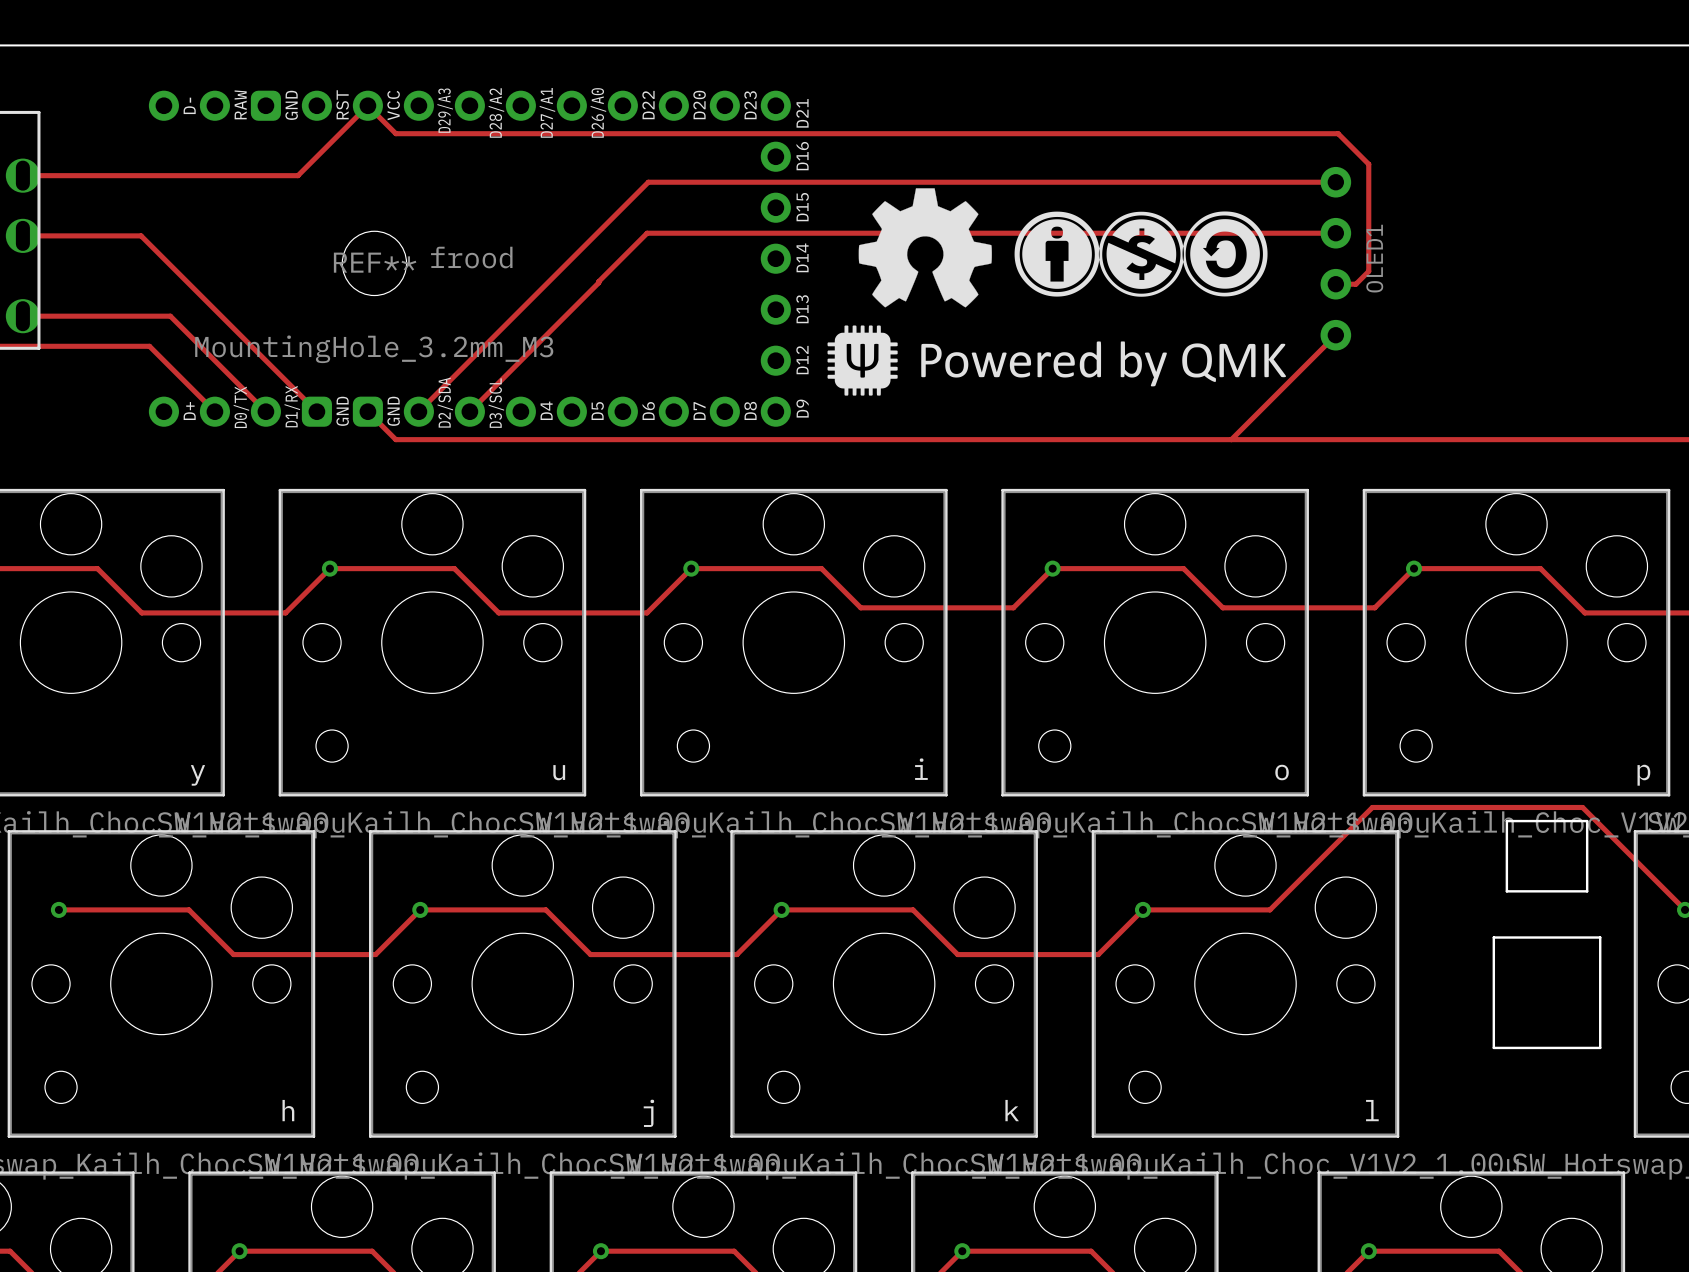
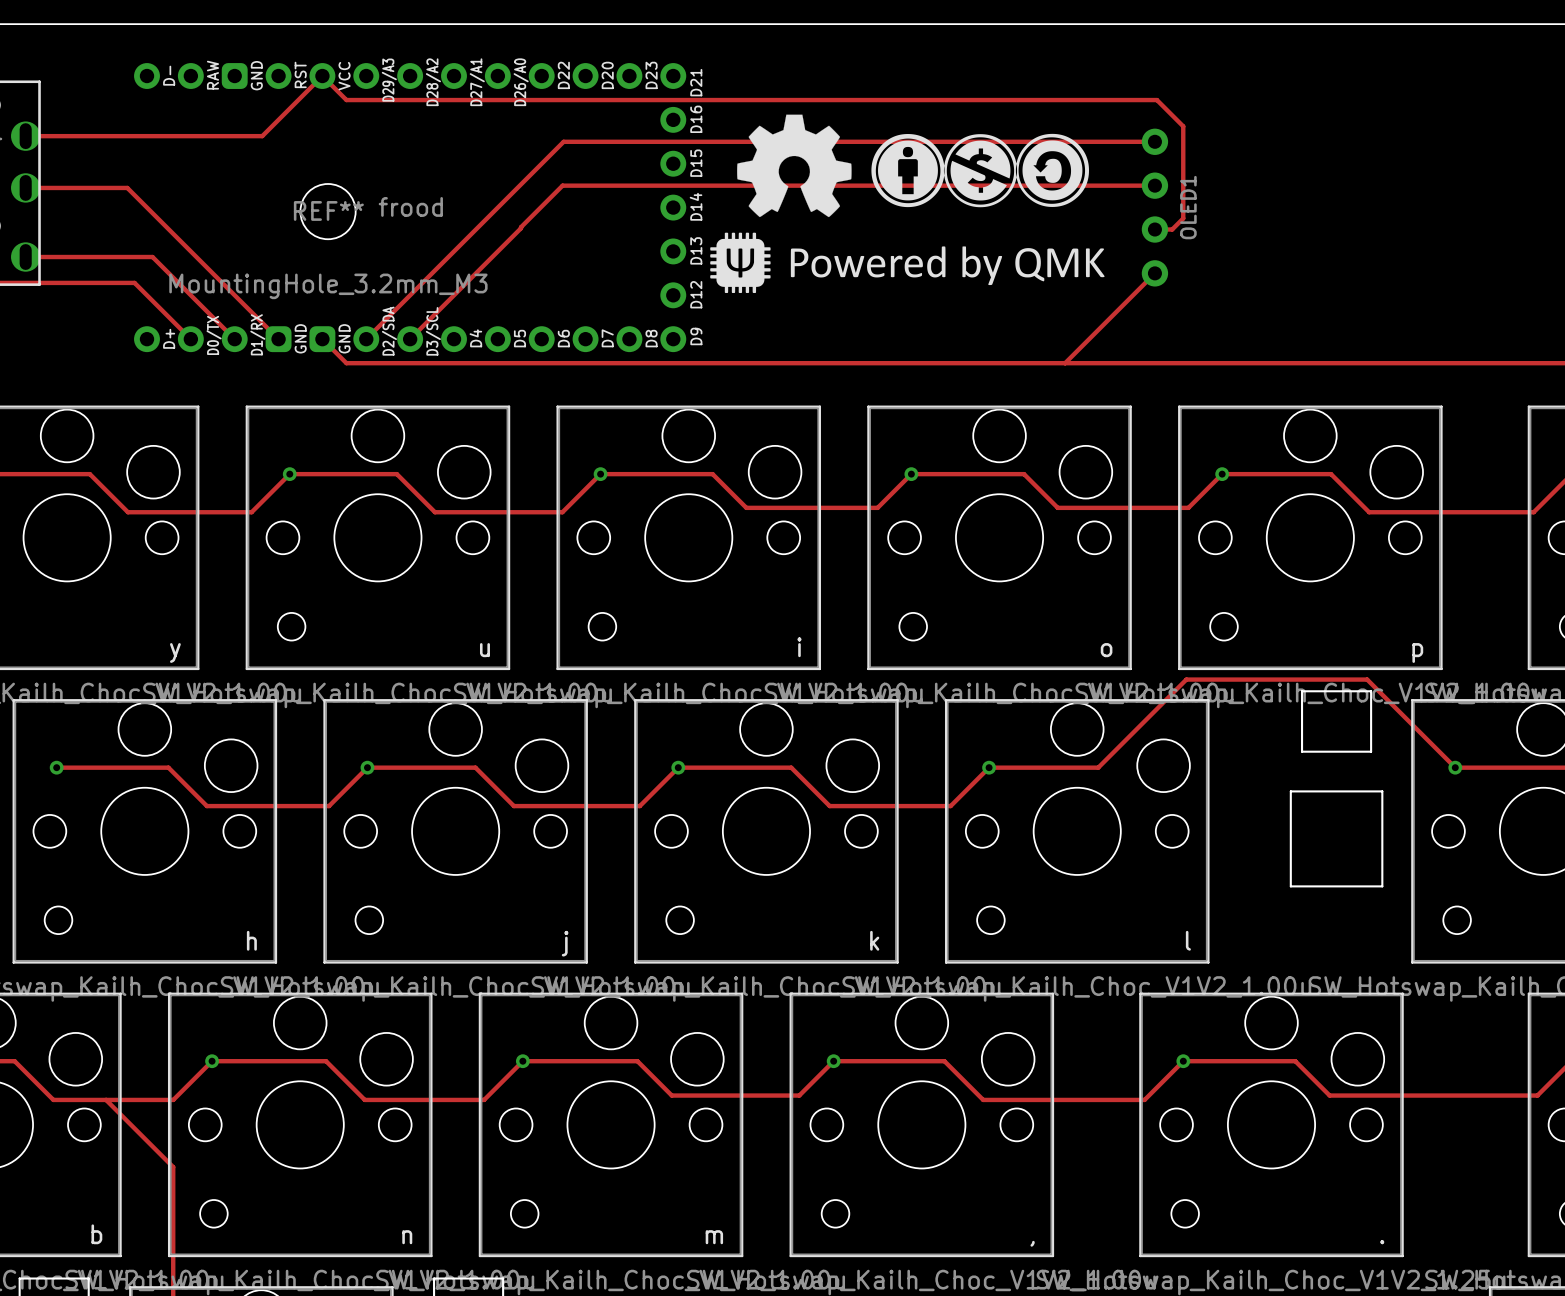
drawing position: (1144, 241) -> (982, 159)
drawing position: (925, 247) -> (794, 165)
drawing position: (1225, 253) -> (1052, 170)
drawing position: (1225, 253) -> (1052, 170)
drawing position: (1056, 254) -> (907, 170)
drawing position: (1057, 254) -> (907, 170)
drawing position: (1141, 254) -> (980, 170)
drawing position: (1139, 265) -> (978, 180)
drawing position: (1056, 360) -> (907, 262)

